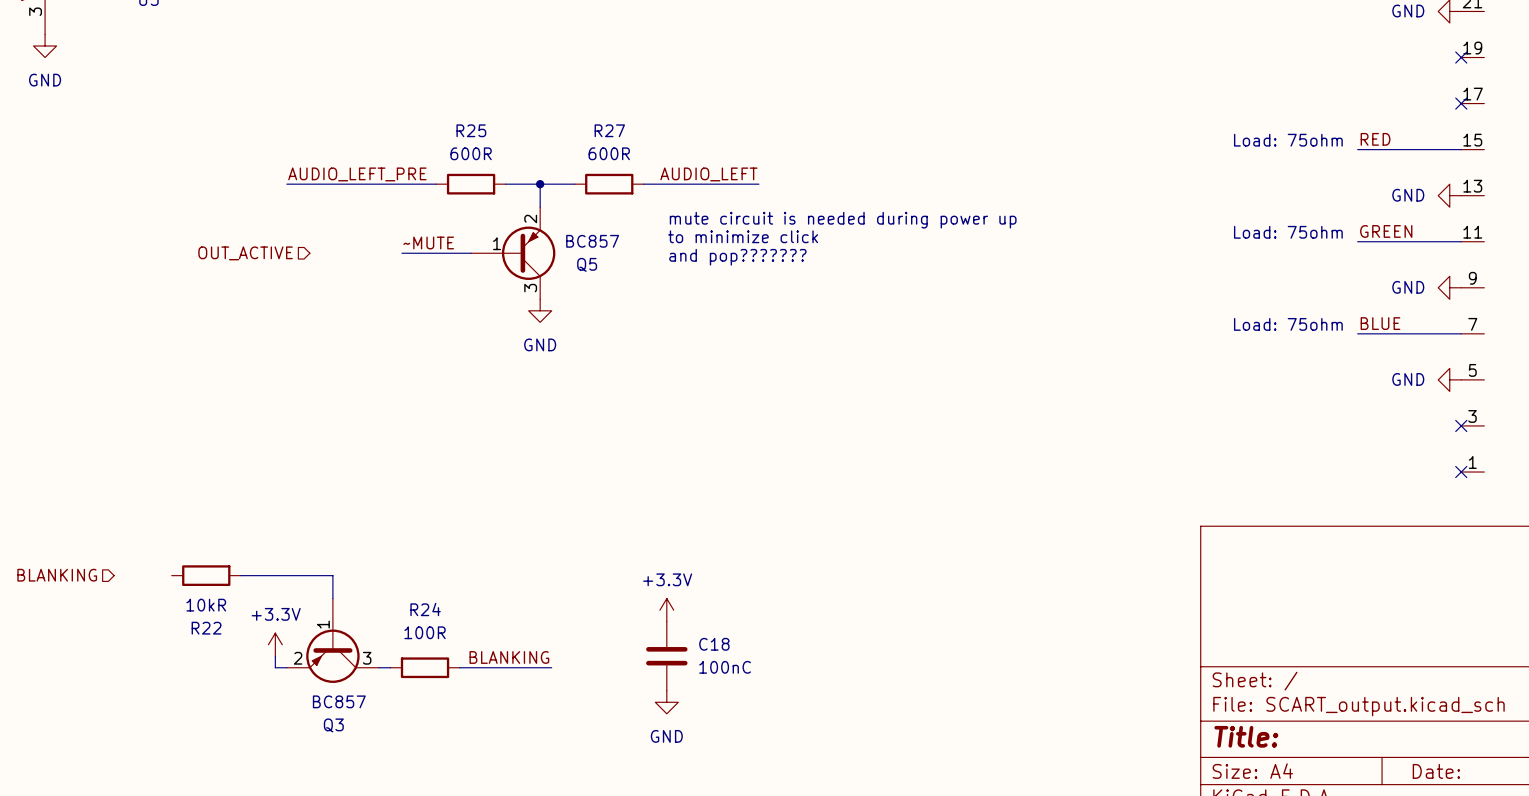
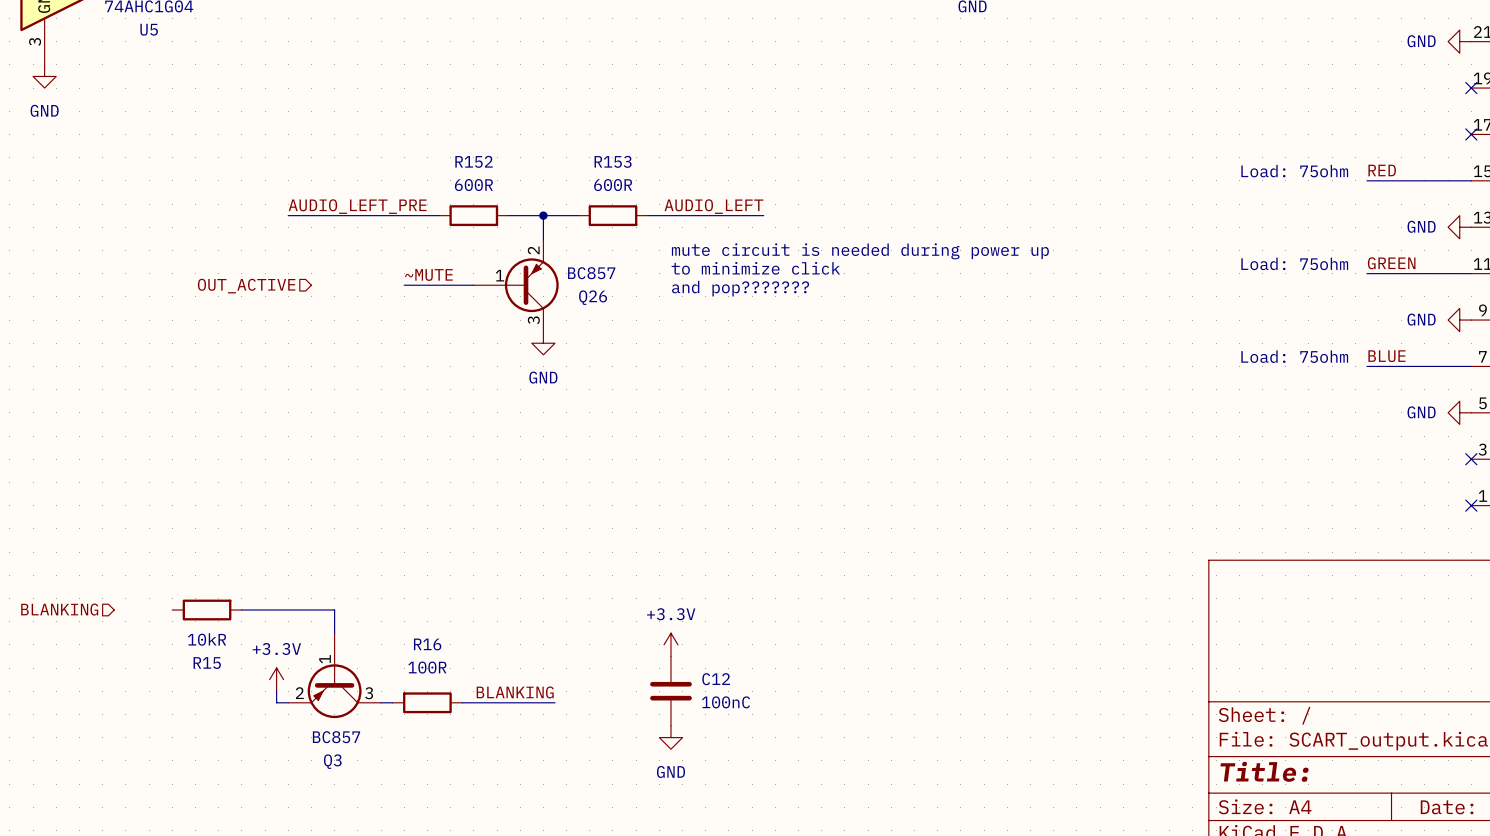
R25 name: R25 (471, 130) -> R152 (474, 161)
R27 name: R27 (609, 130) -> R153 (613, 161)
Q5 name: Q5 (587, 264) -> Q26 (593, 297)
R24 name: R24 (425, 609) -> R16 (427, 644)
R22 name: R22 (206, 628) -> R15 (207, 663)
C18 name: C18 (714, 644) -> C12 (716, 679)

